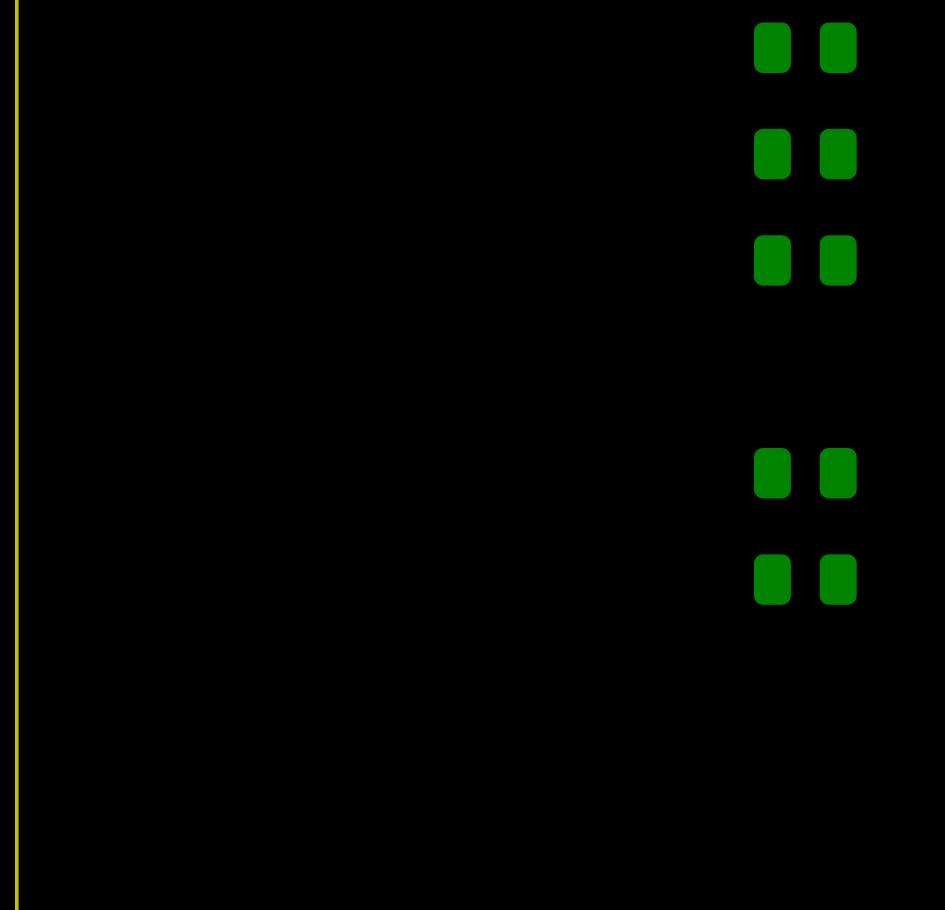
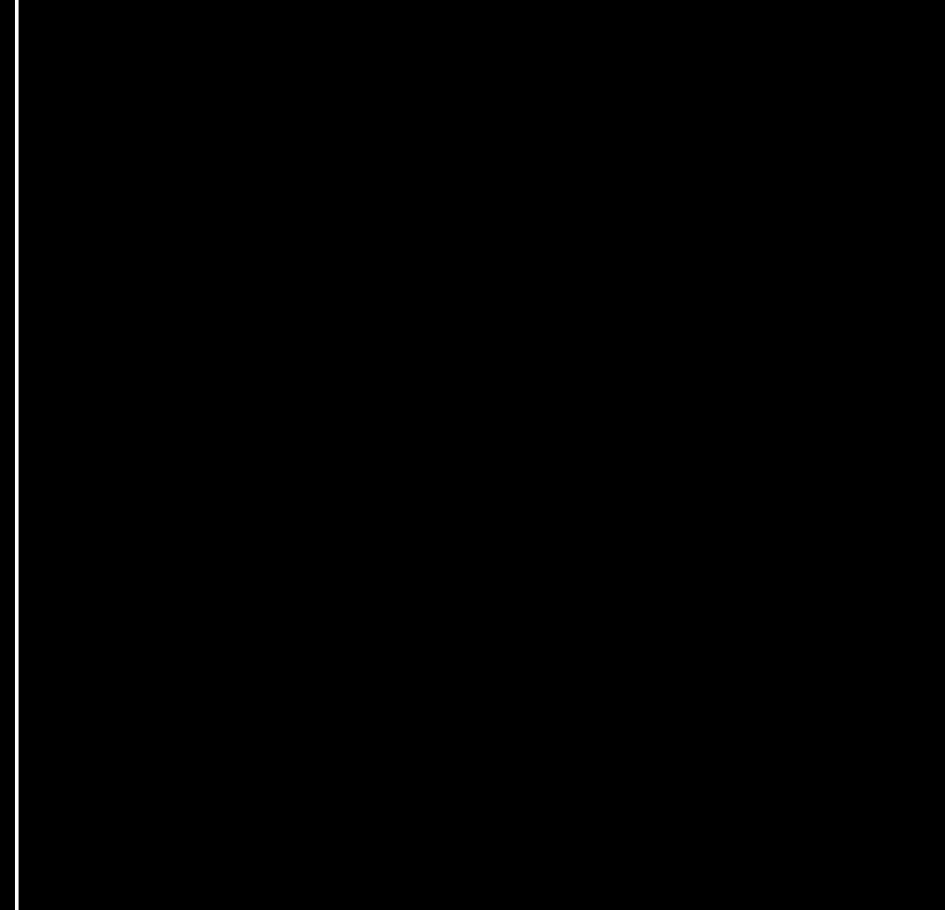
part: (805, 47) -> none
part: (805, 154) -> none
part: (805, 260) -> none
part: (805, 473) -> none
part: (805, 579) -> none

